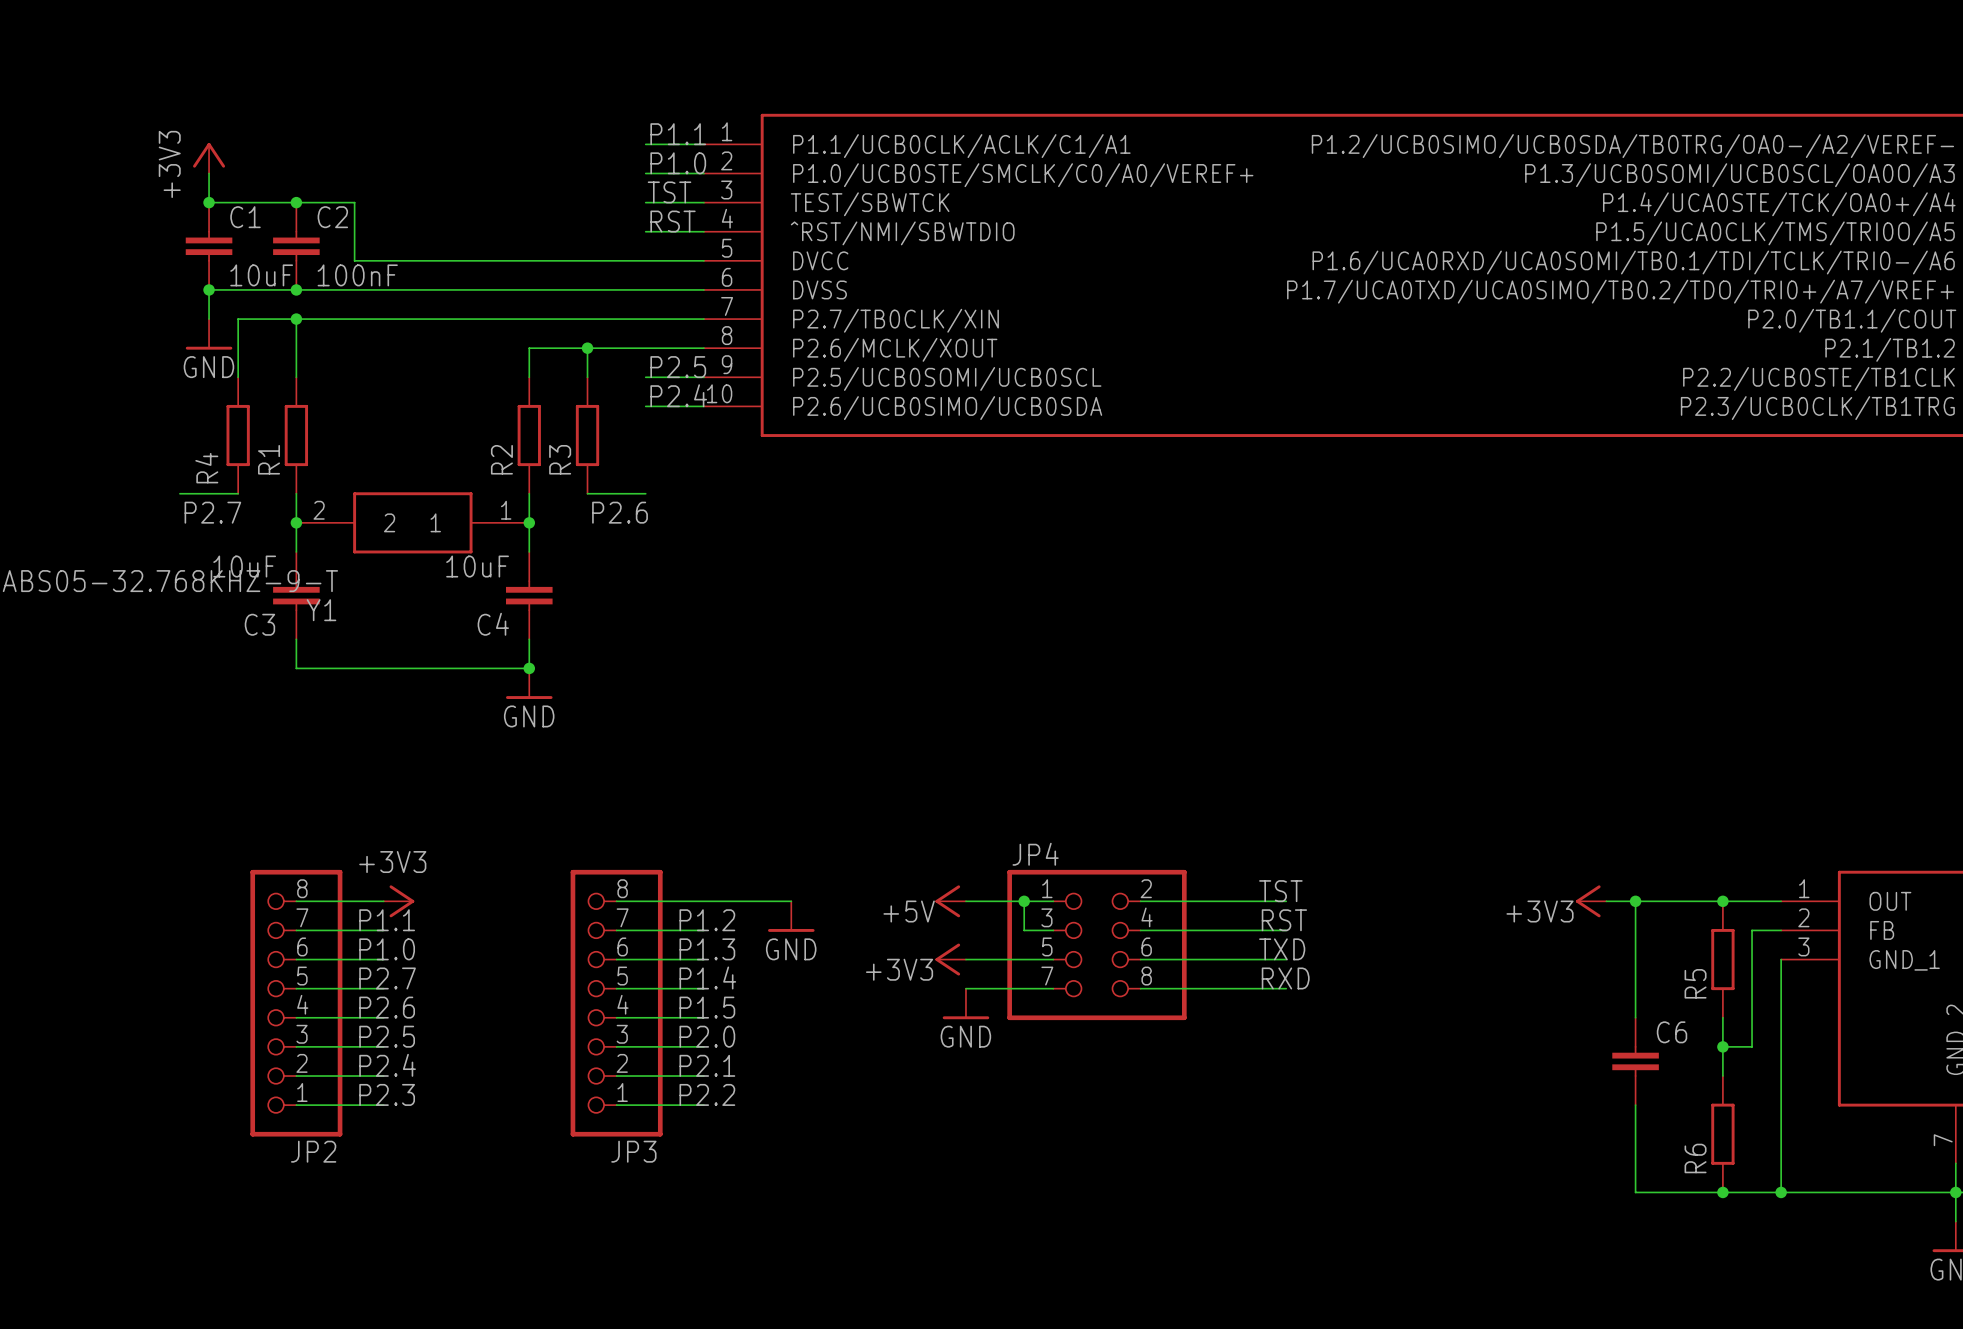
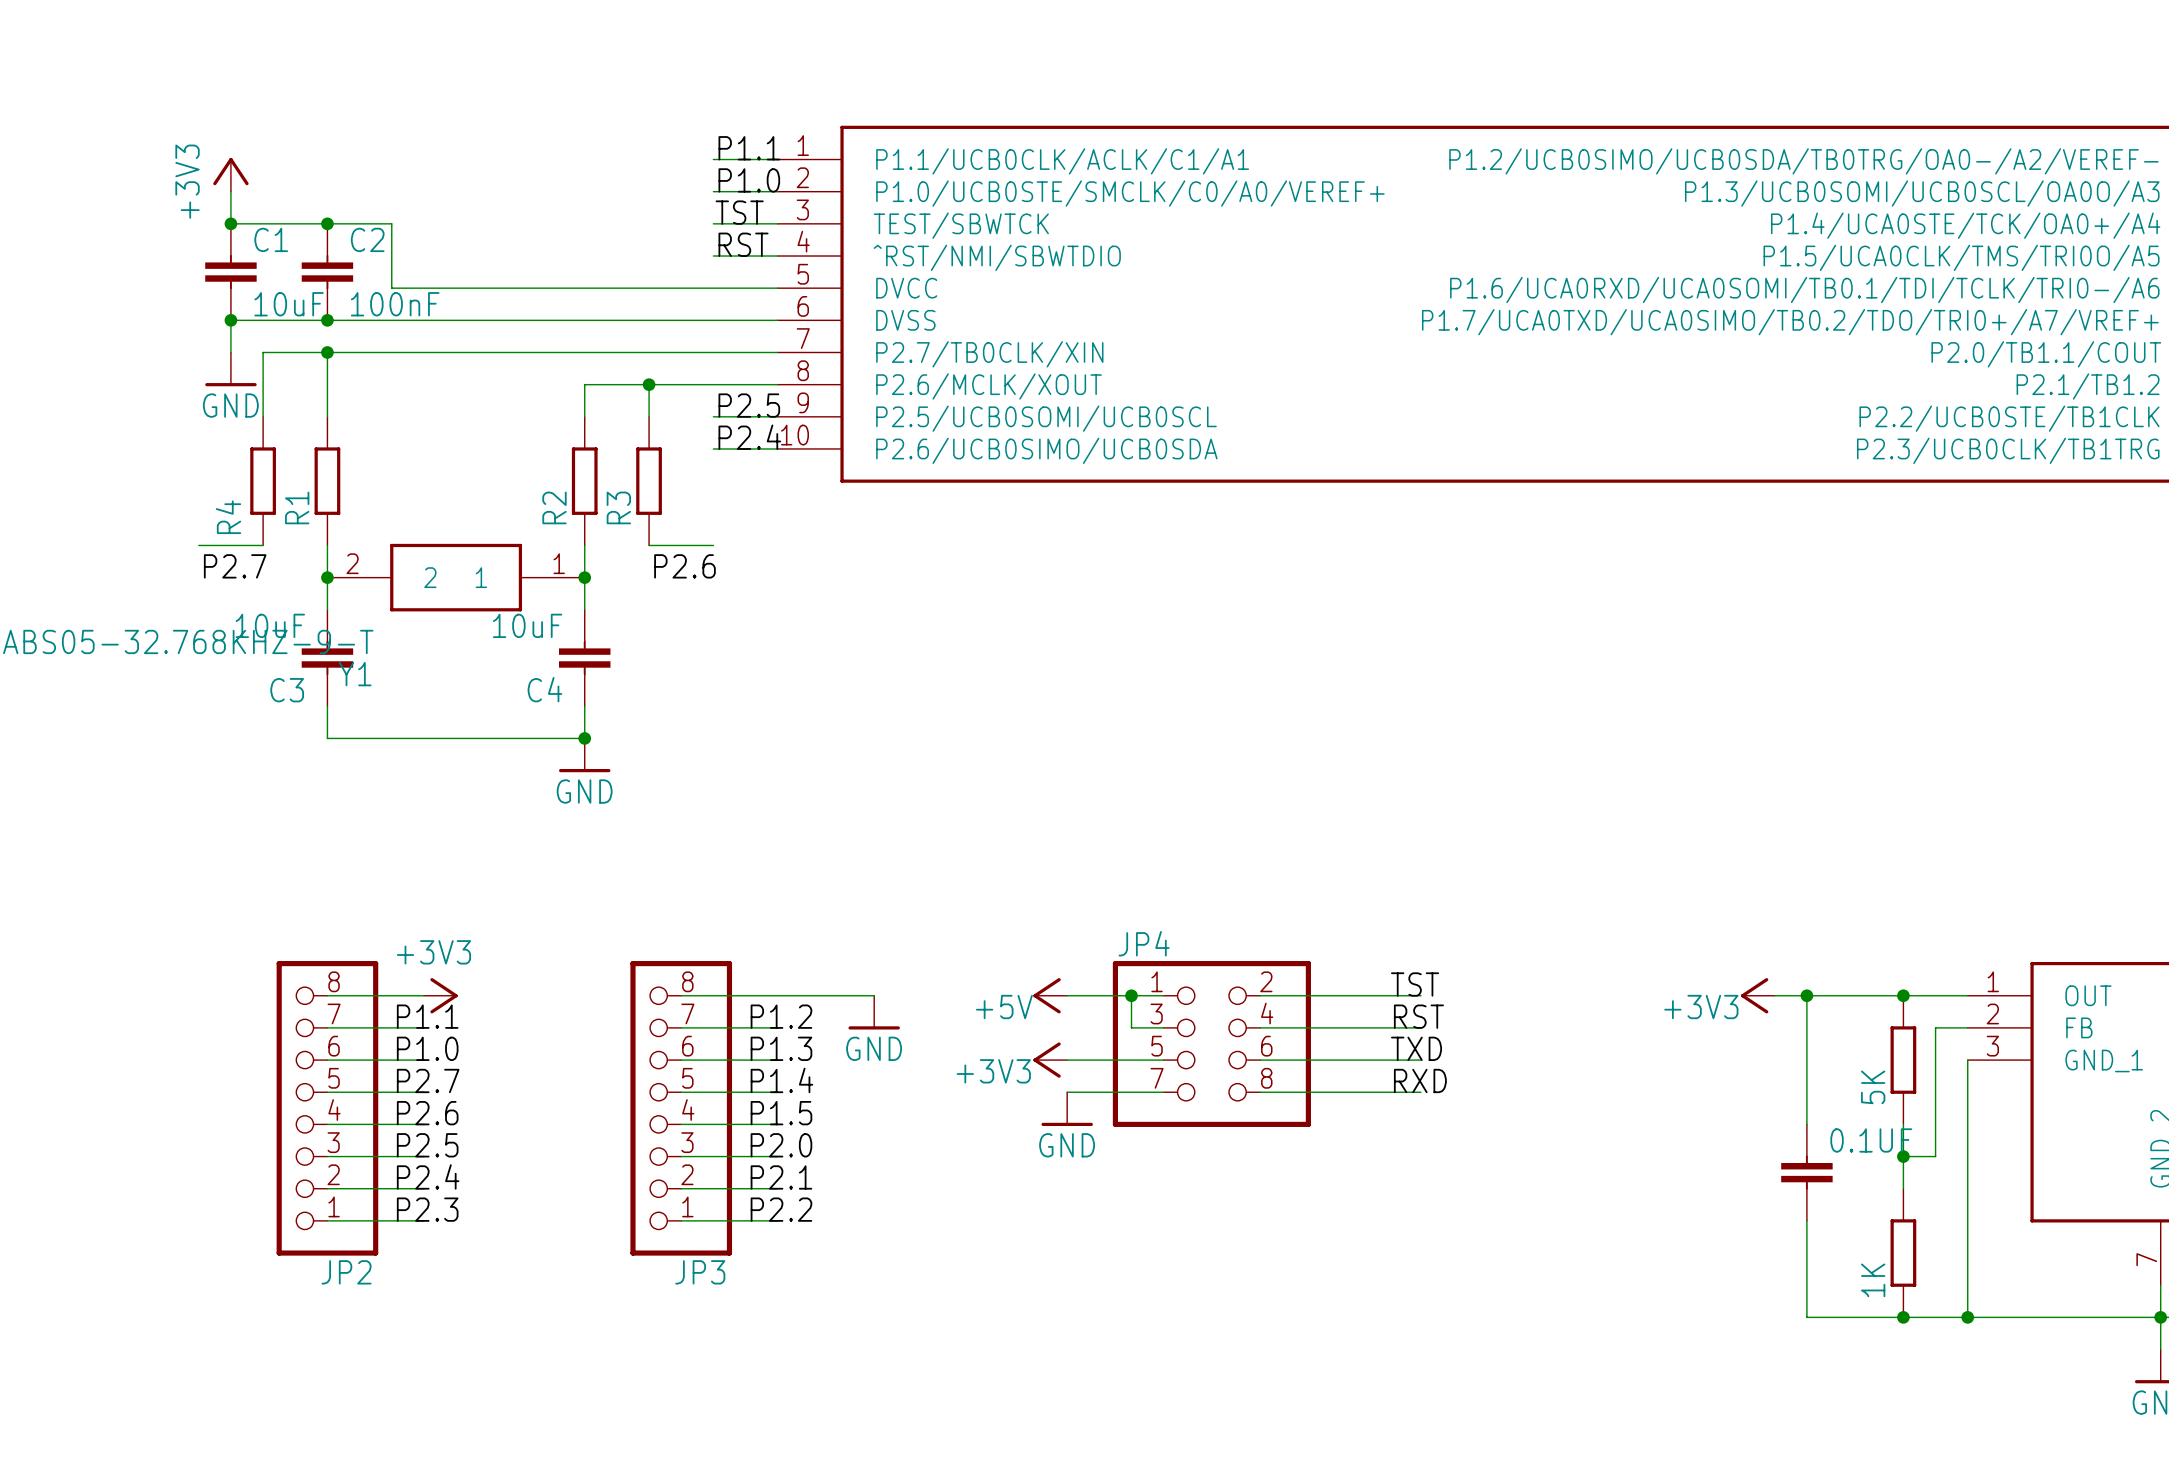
R5 name: R5 (1695, 983) -> 5K (1873, 1087)
C6 name: C6 (1672, 1032) -> 0.1UF (1871, 1140)
R6 name: R6 (1695, 1158) -> 1K (1873, 1280)

